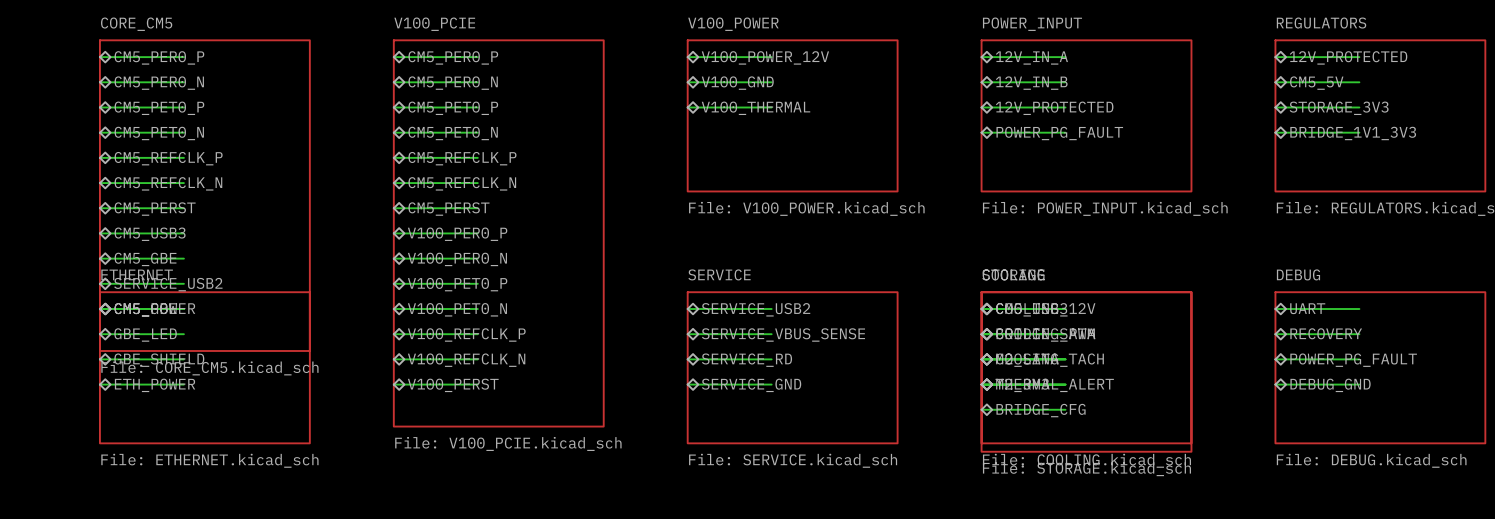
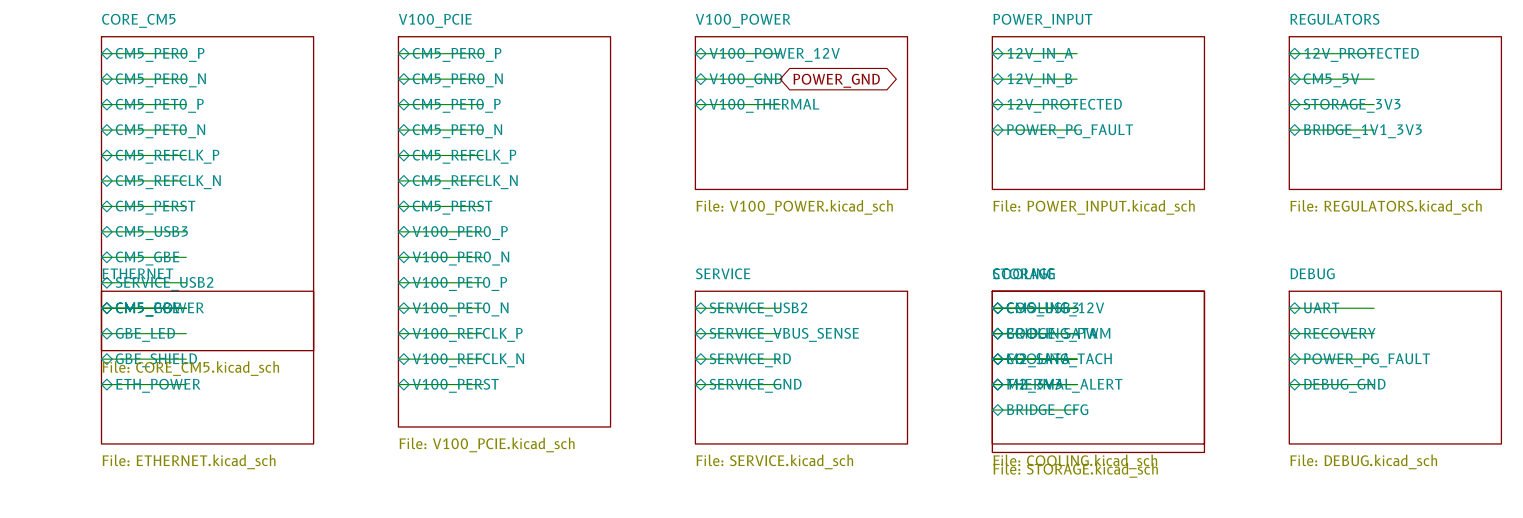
global label: none -> POWER_GND (836, 80)

